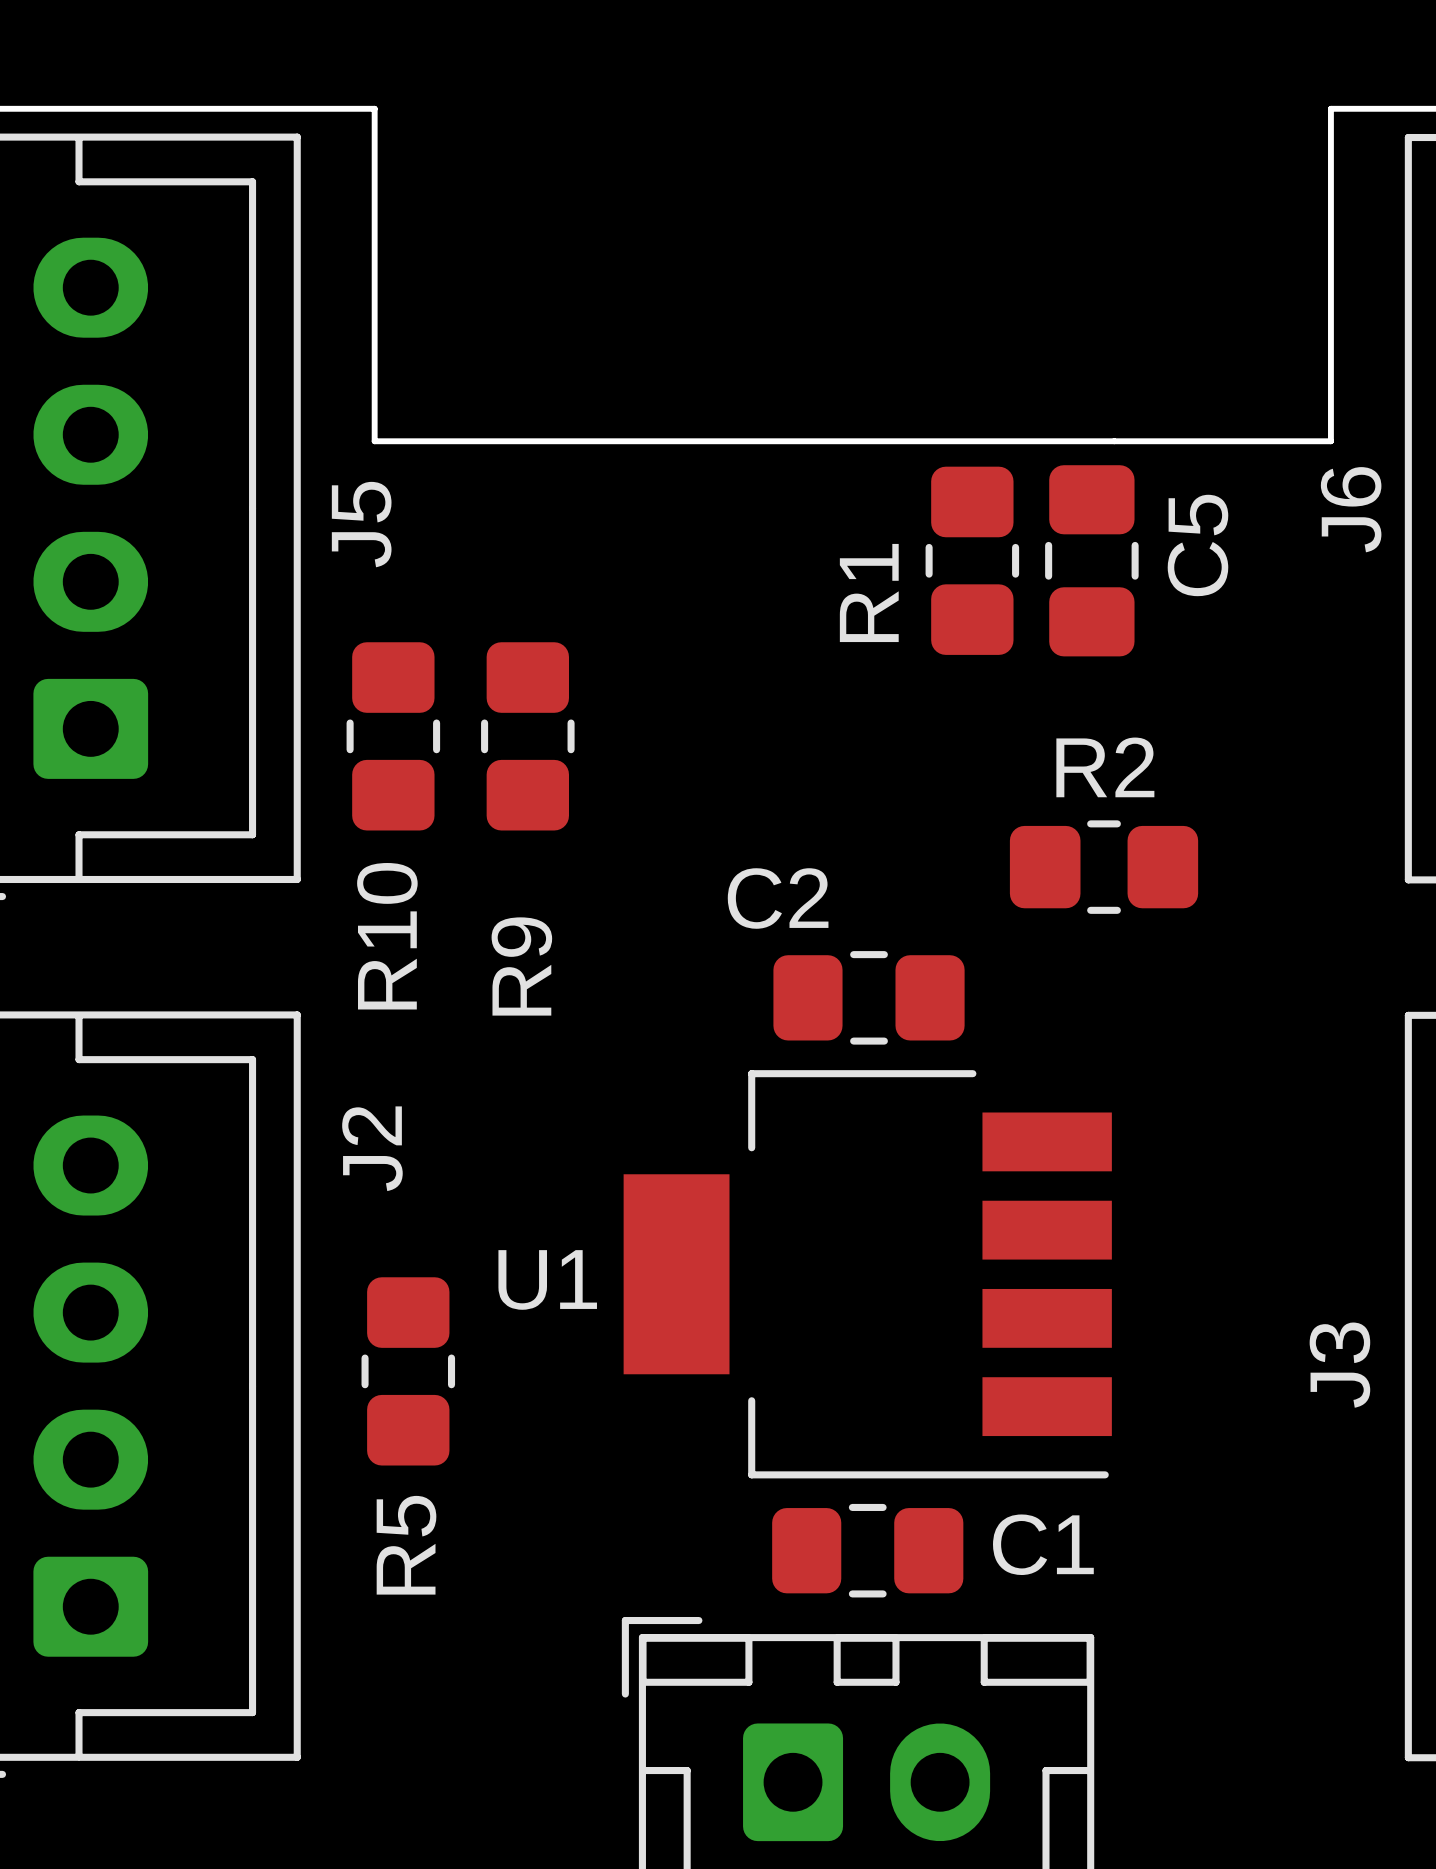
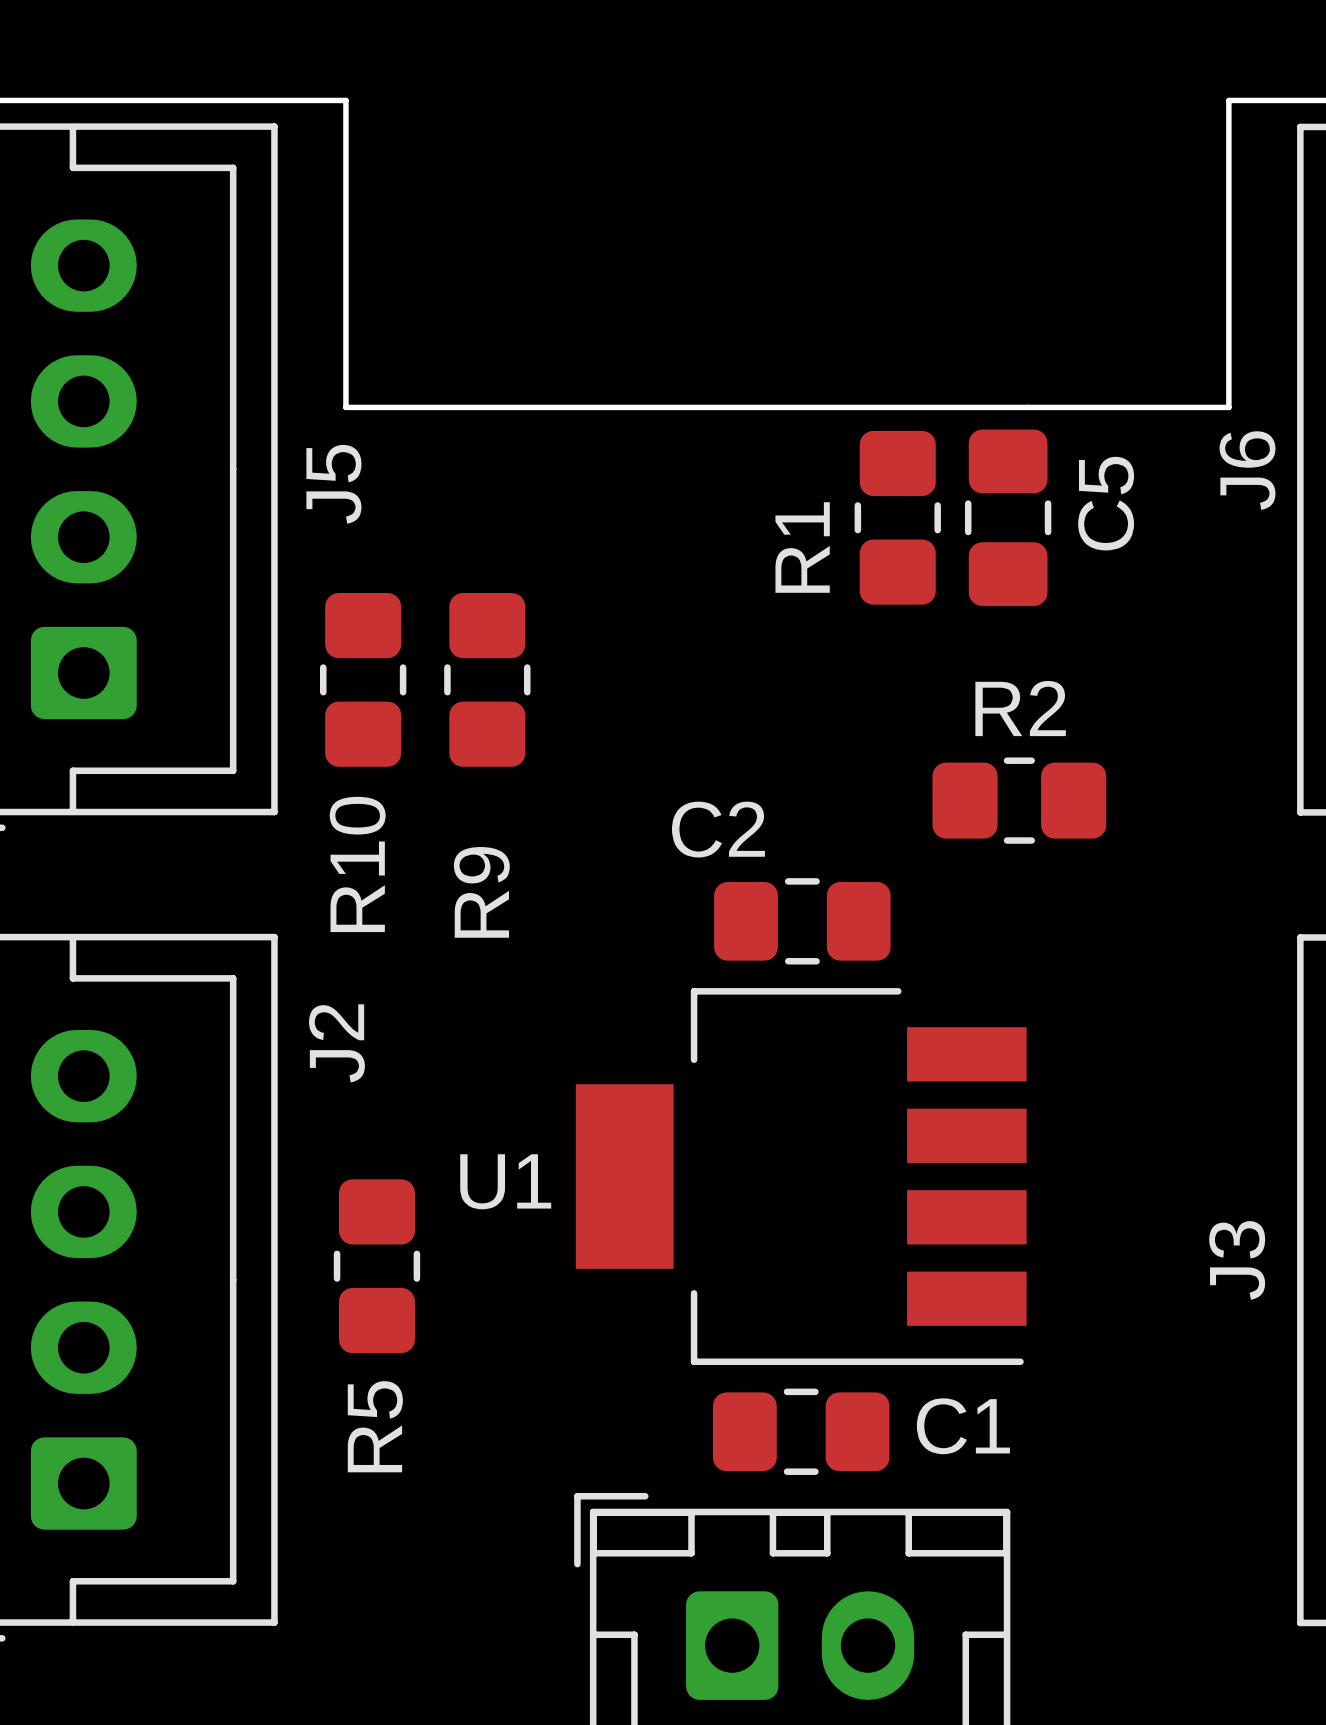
J2 name position: J2 (372, 1148) -> J2 (336, 1043)

